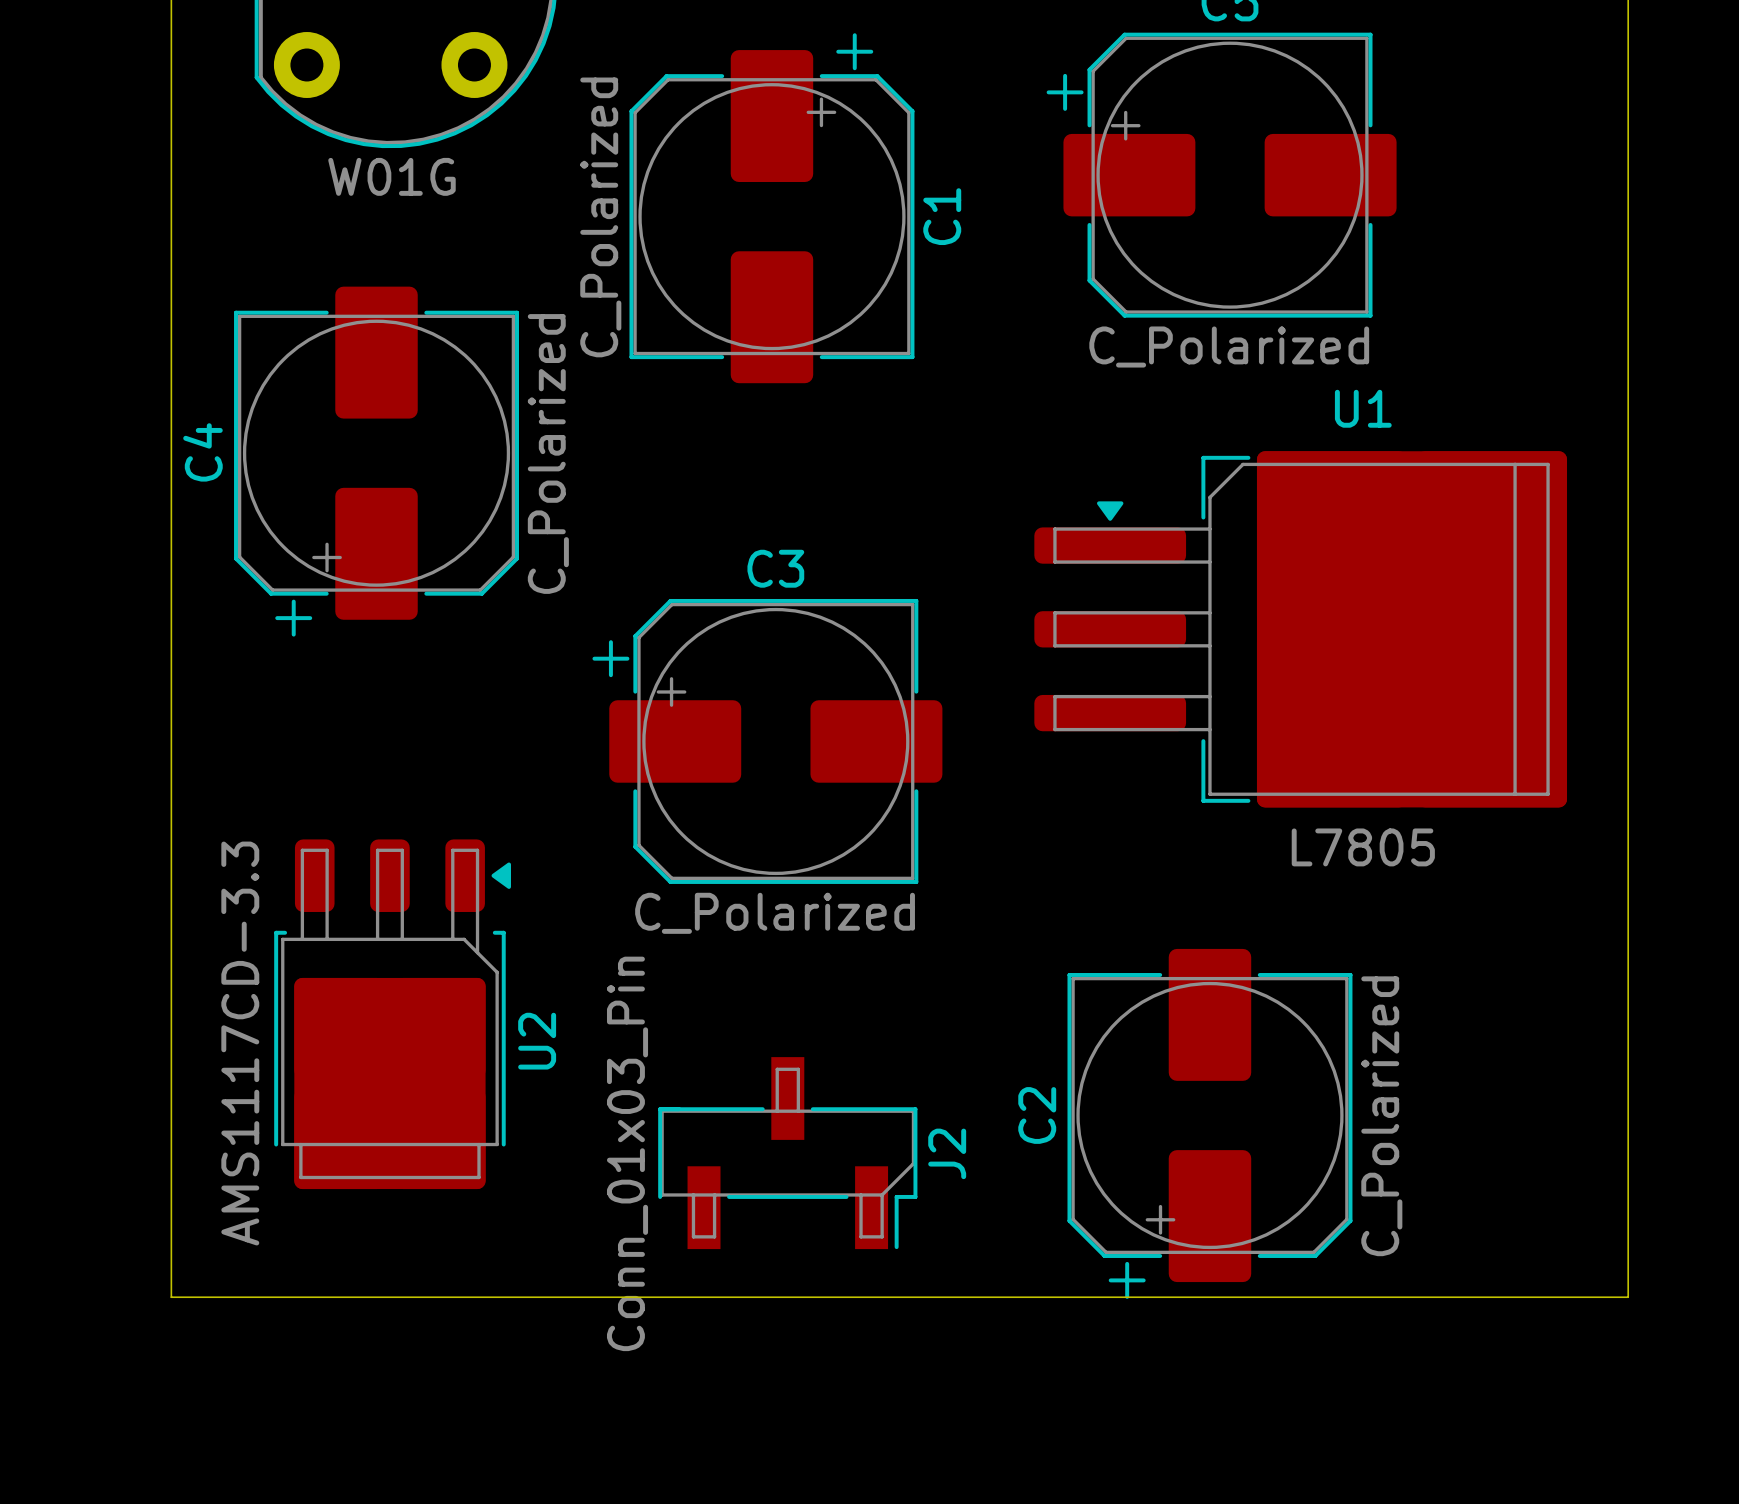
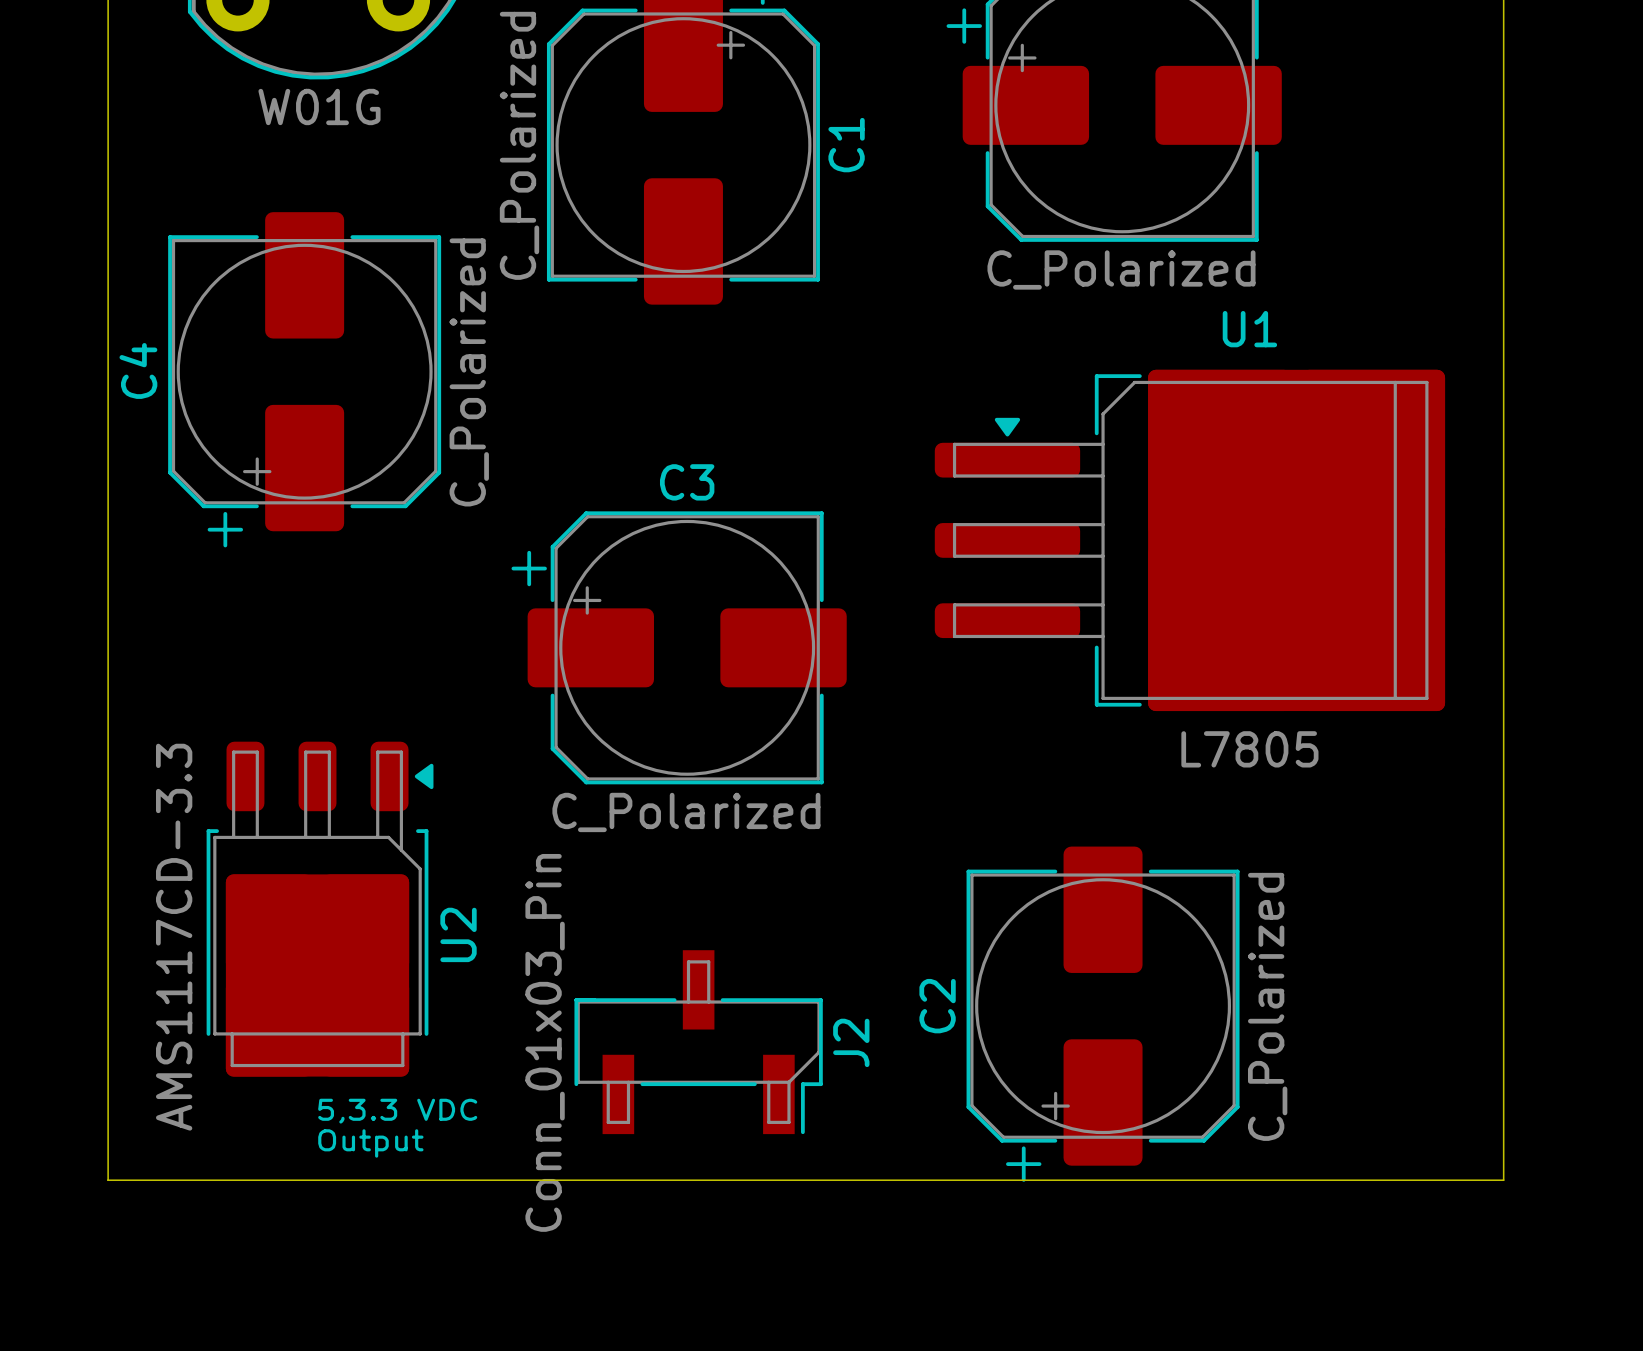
text: none -> 5,3.3 VDC (397, 1111)
text: none -> Output (370, 1143)

